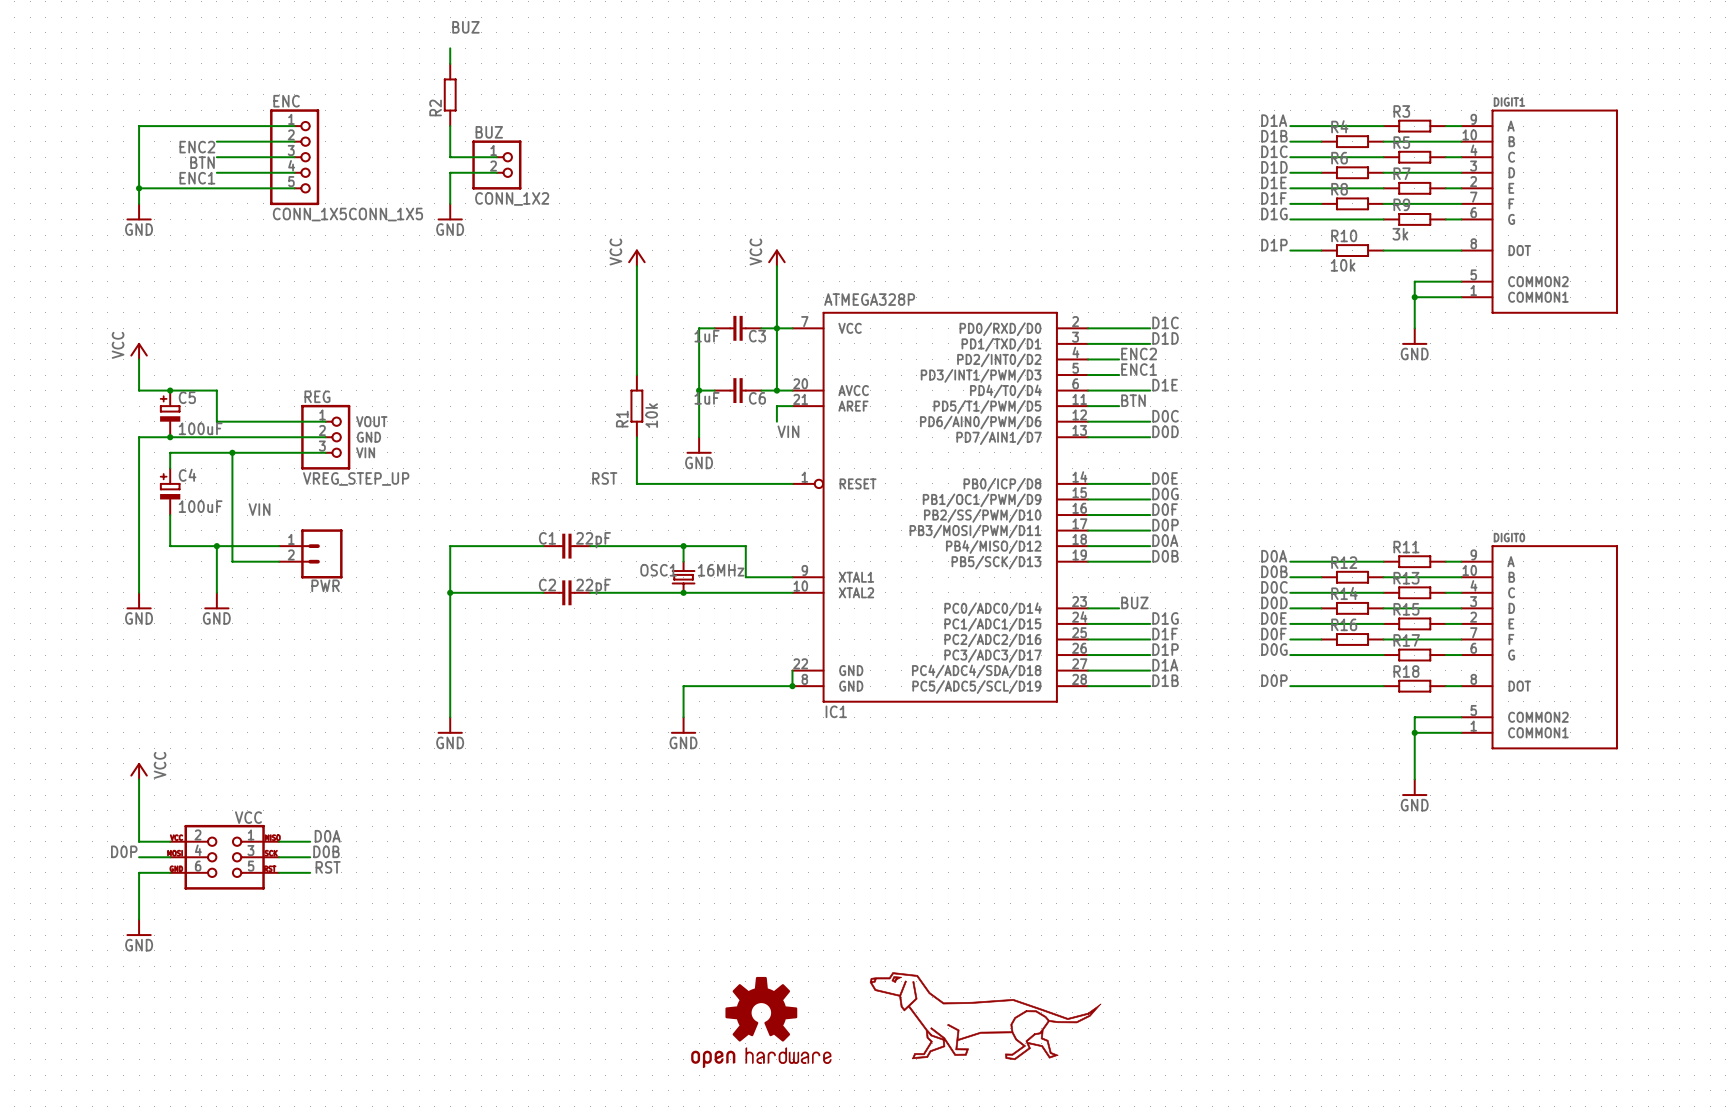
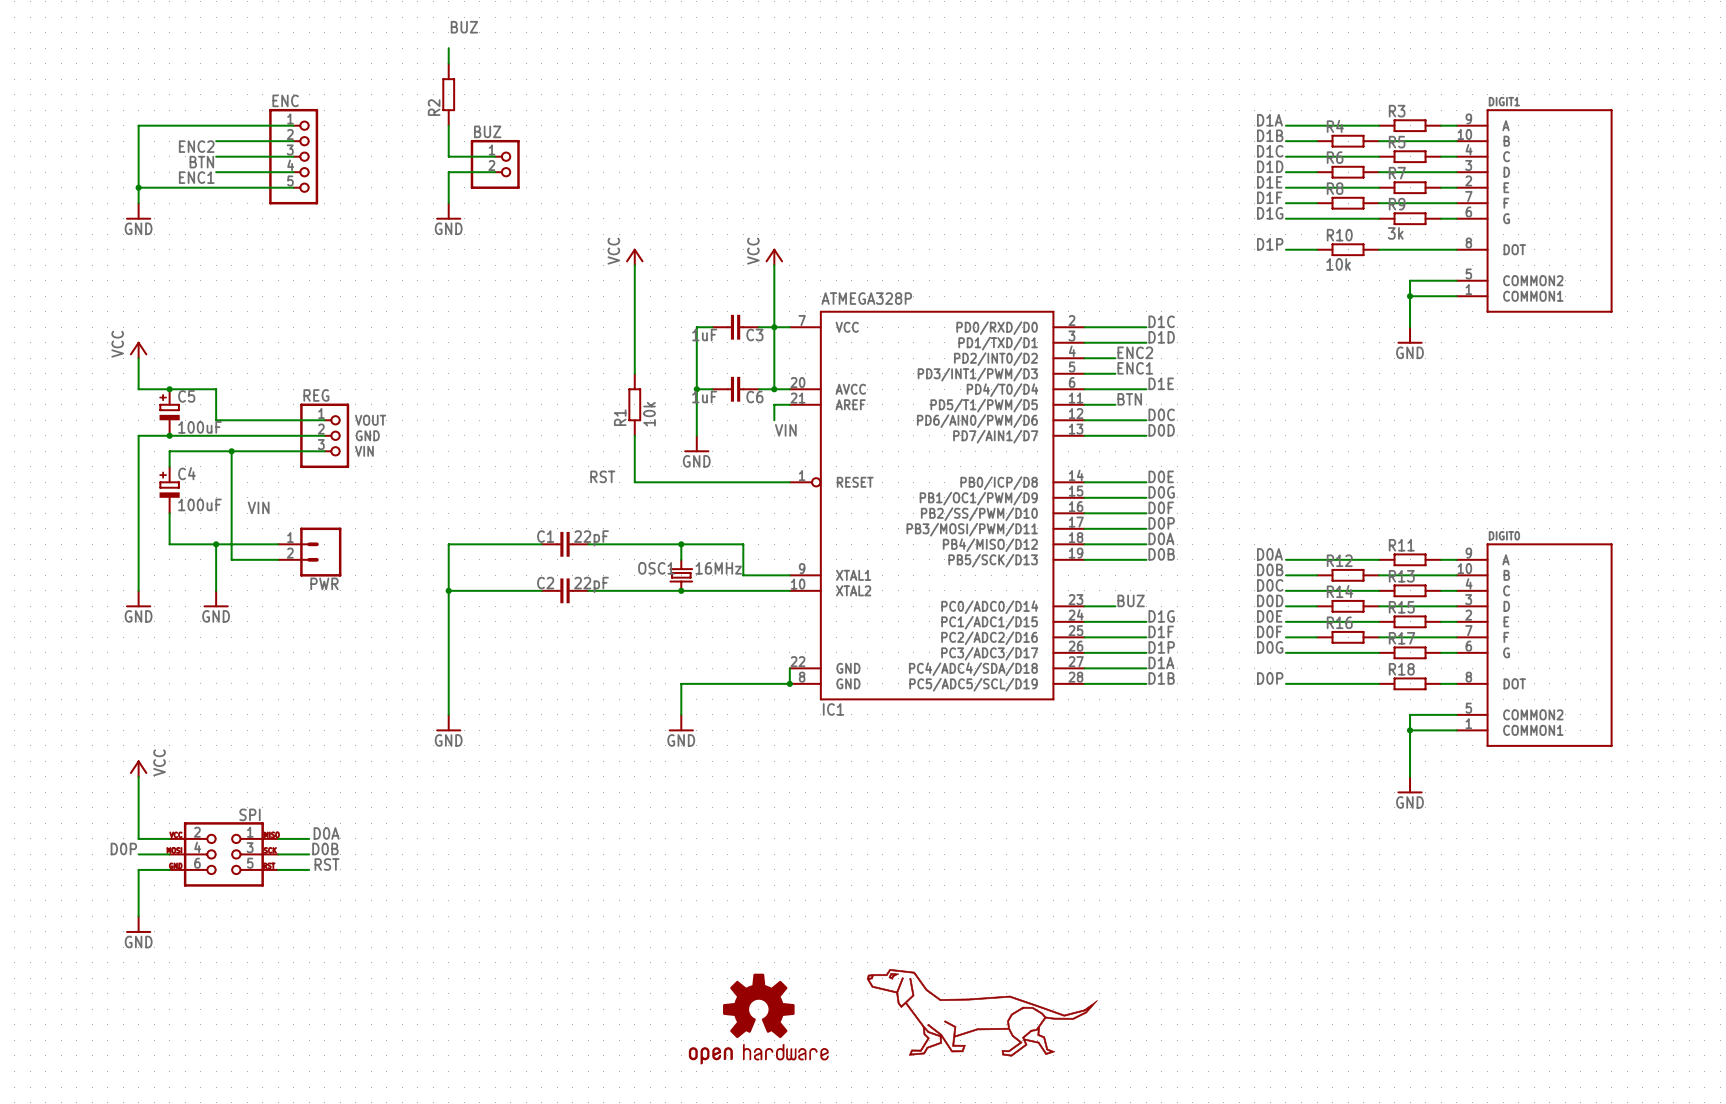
BUZ value: CONN_1X2 (512, 198) -> none
ENC value: CONN_1X5CONN_1X5 (347, 214) -> none
REG value: VREG_STEP_UP (356, 478) -> none
VCC name: VCC (248, 817) -> SPI (249, 814)

